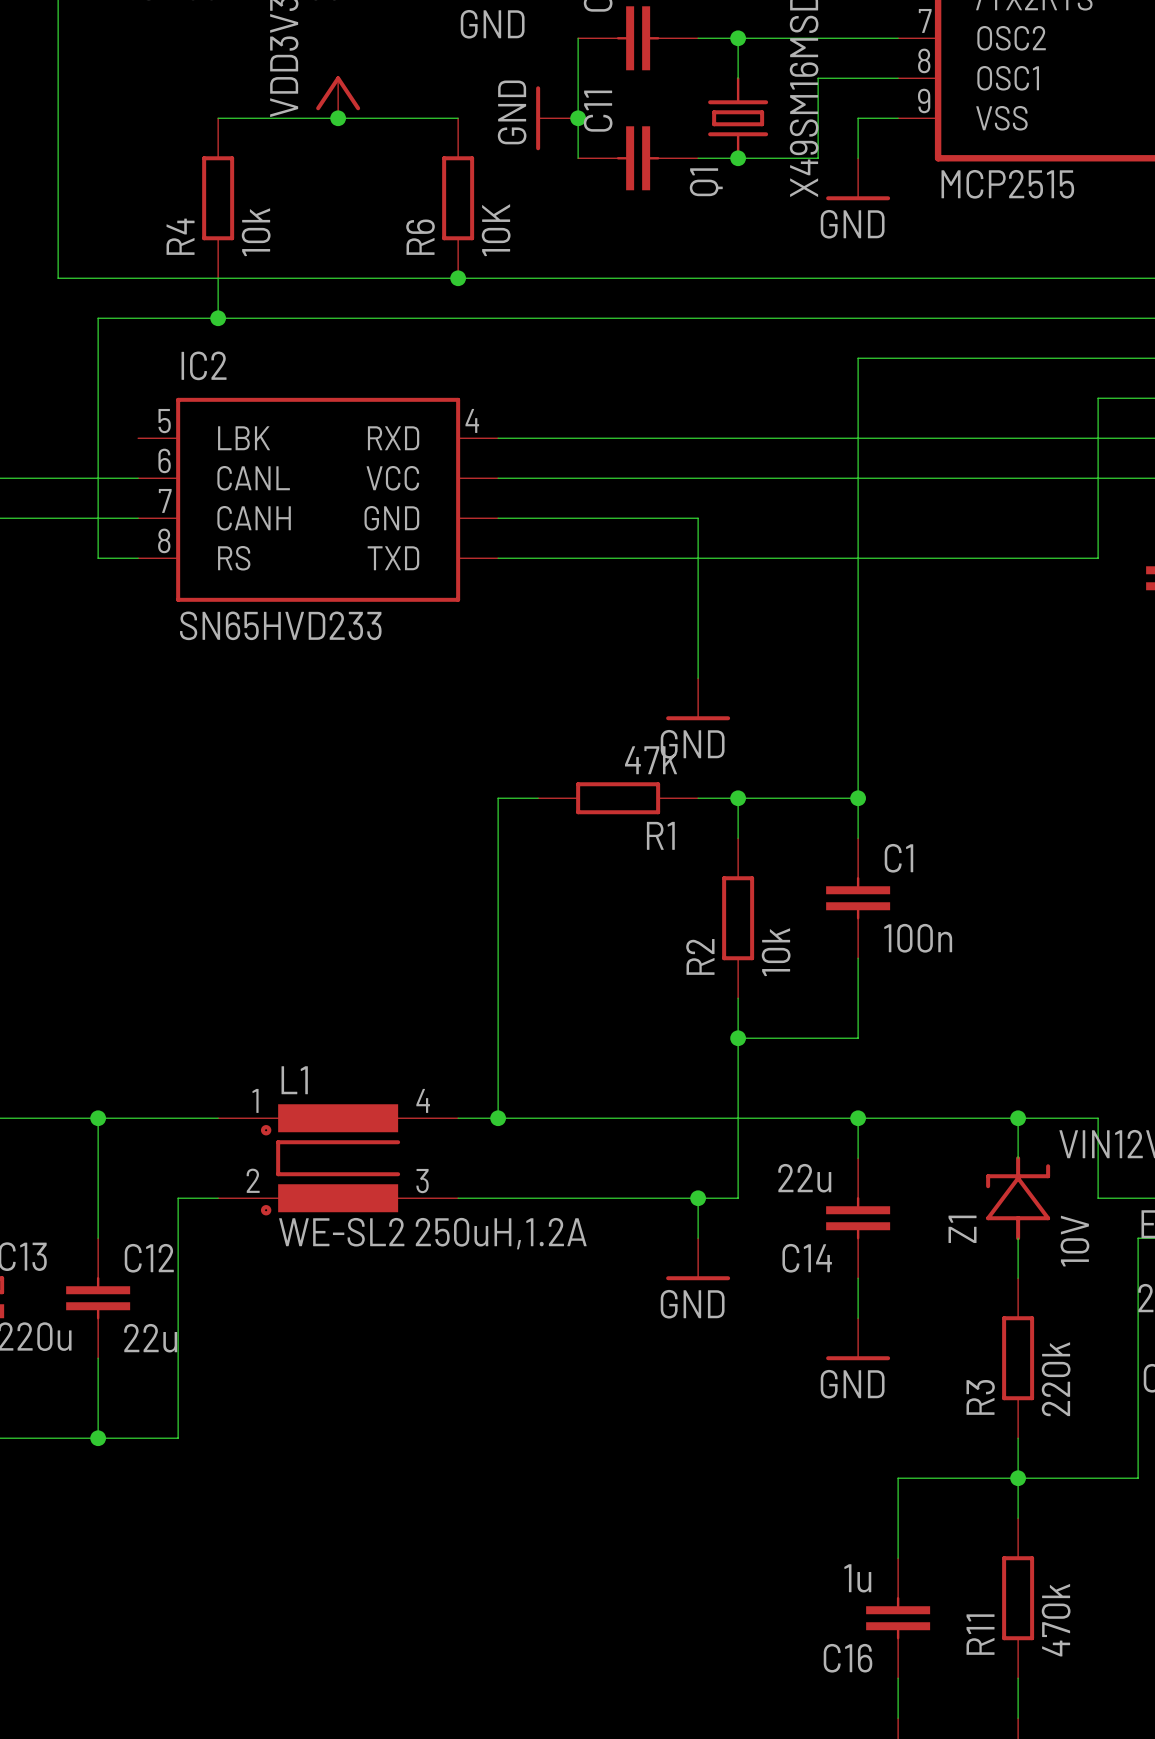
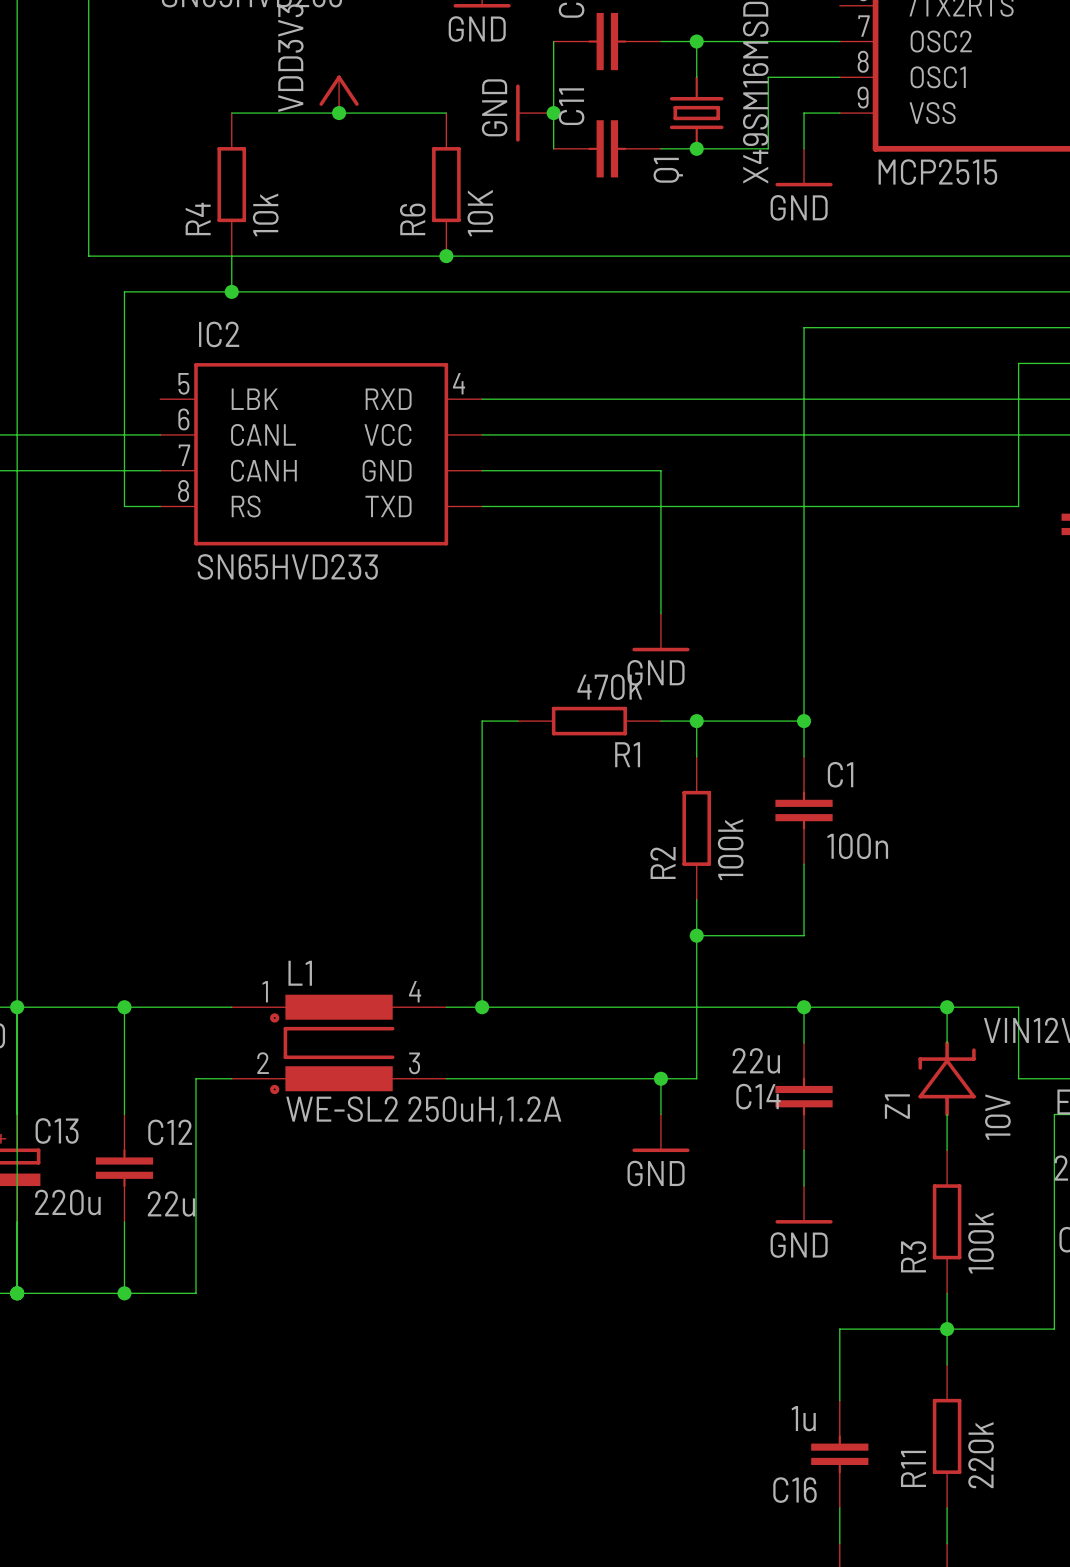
R1 value: 47k (651, 760) -> 470k (609, 687)
R2 value: 10k (776, 952) -> 100k (730, 849)
C14 name position: C14 (807, 1258) -> C14 (758, 1096)
R3 value: 220k (1056, 1379) -> 100k (981, 1243)
R11 value: 470k (1056, 1620) -> 220k (981, 1455)

